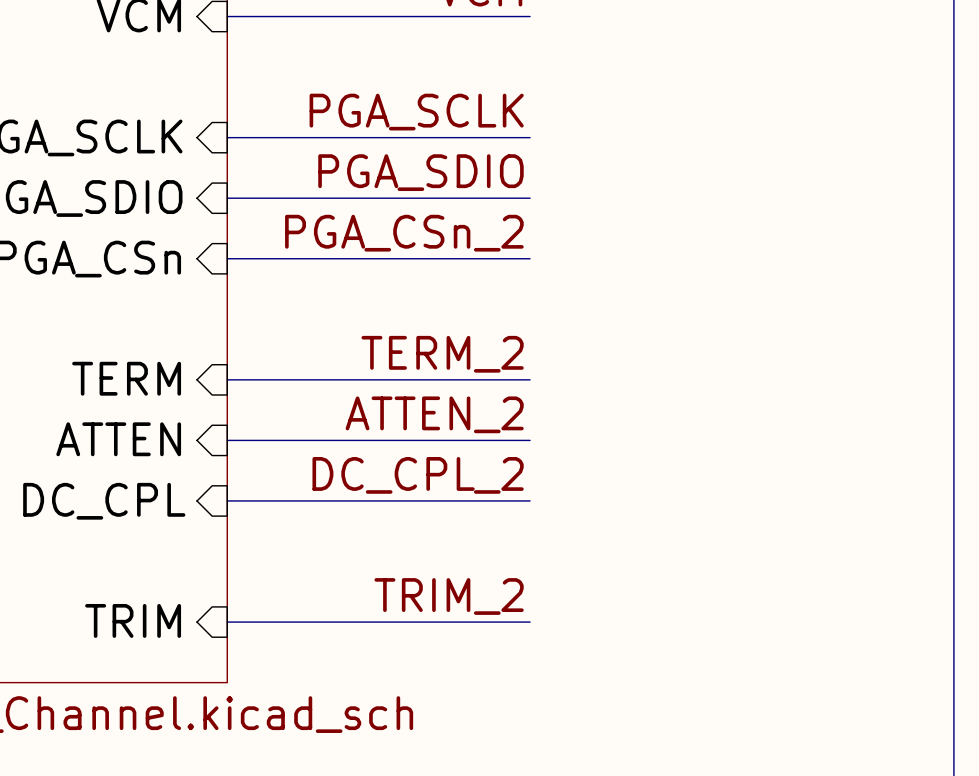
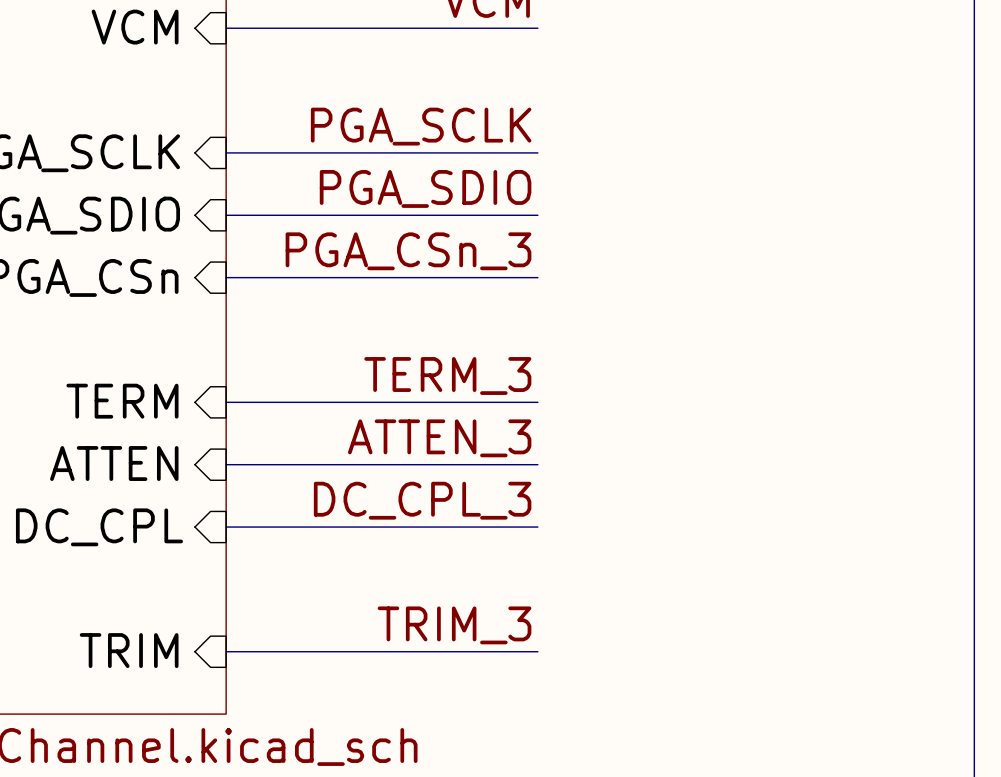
label: PGA_CSn_2 (404, 233) -> PGA_CSn_3 (408, 251)
label: TERM_2 (442, 354) -> TERM_3 (447, 376)
label: ATTEN_2 (434, 414) -> ATTEN_3 (439, 438)
label: DC_CPL_2 (418, 475) -> DC_CPL_3 (422, 500)
label: TRIM_2 (449, 596) -> TRIM_3 (454, 625)

